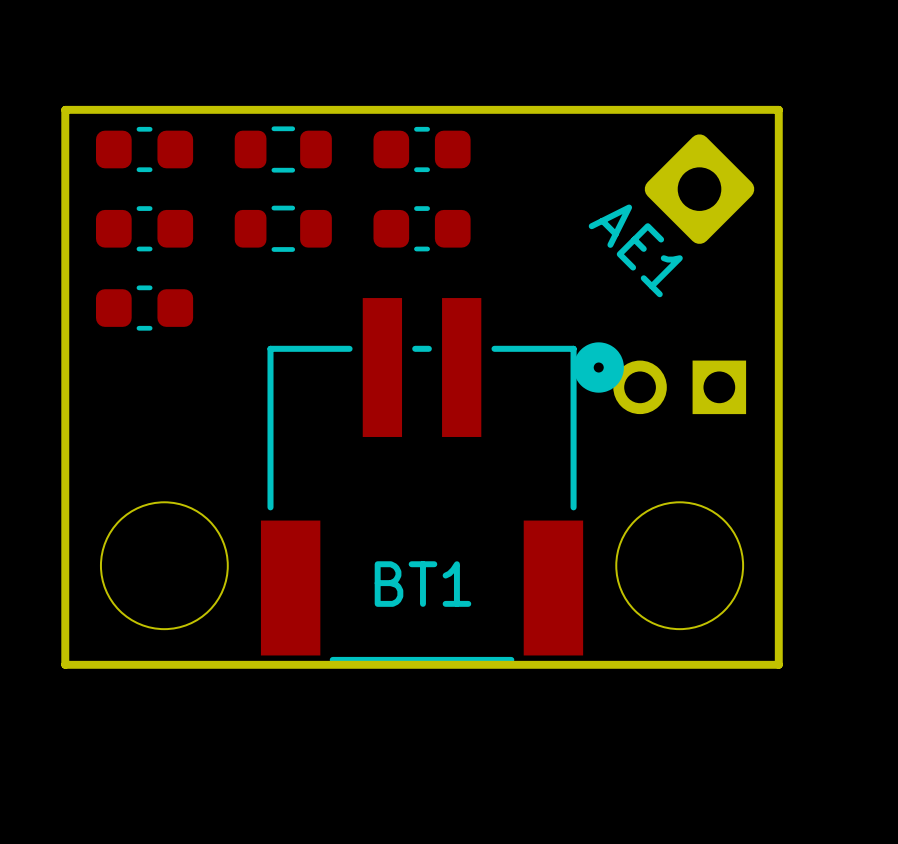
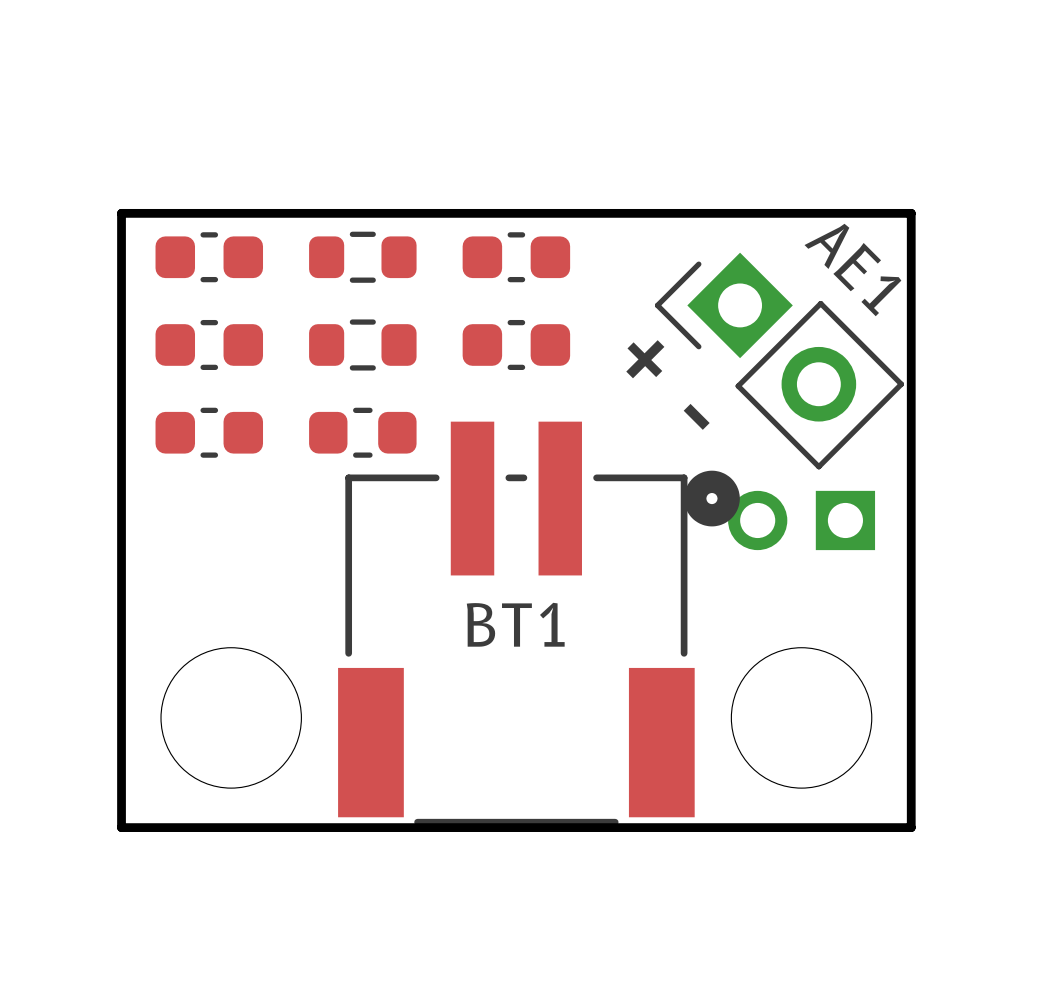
AE1 footprint: [644, 134, 755, 244] -> [654, 252, 905, 470]
AE1 name position: AE1 (635, 250) -> AE1 (852, 270)
text: none -> + - (667, 385)
part: none -> (362, 432)
BT1 name position: BT1 (422, 584) -> BT1 (515, 624)

